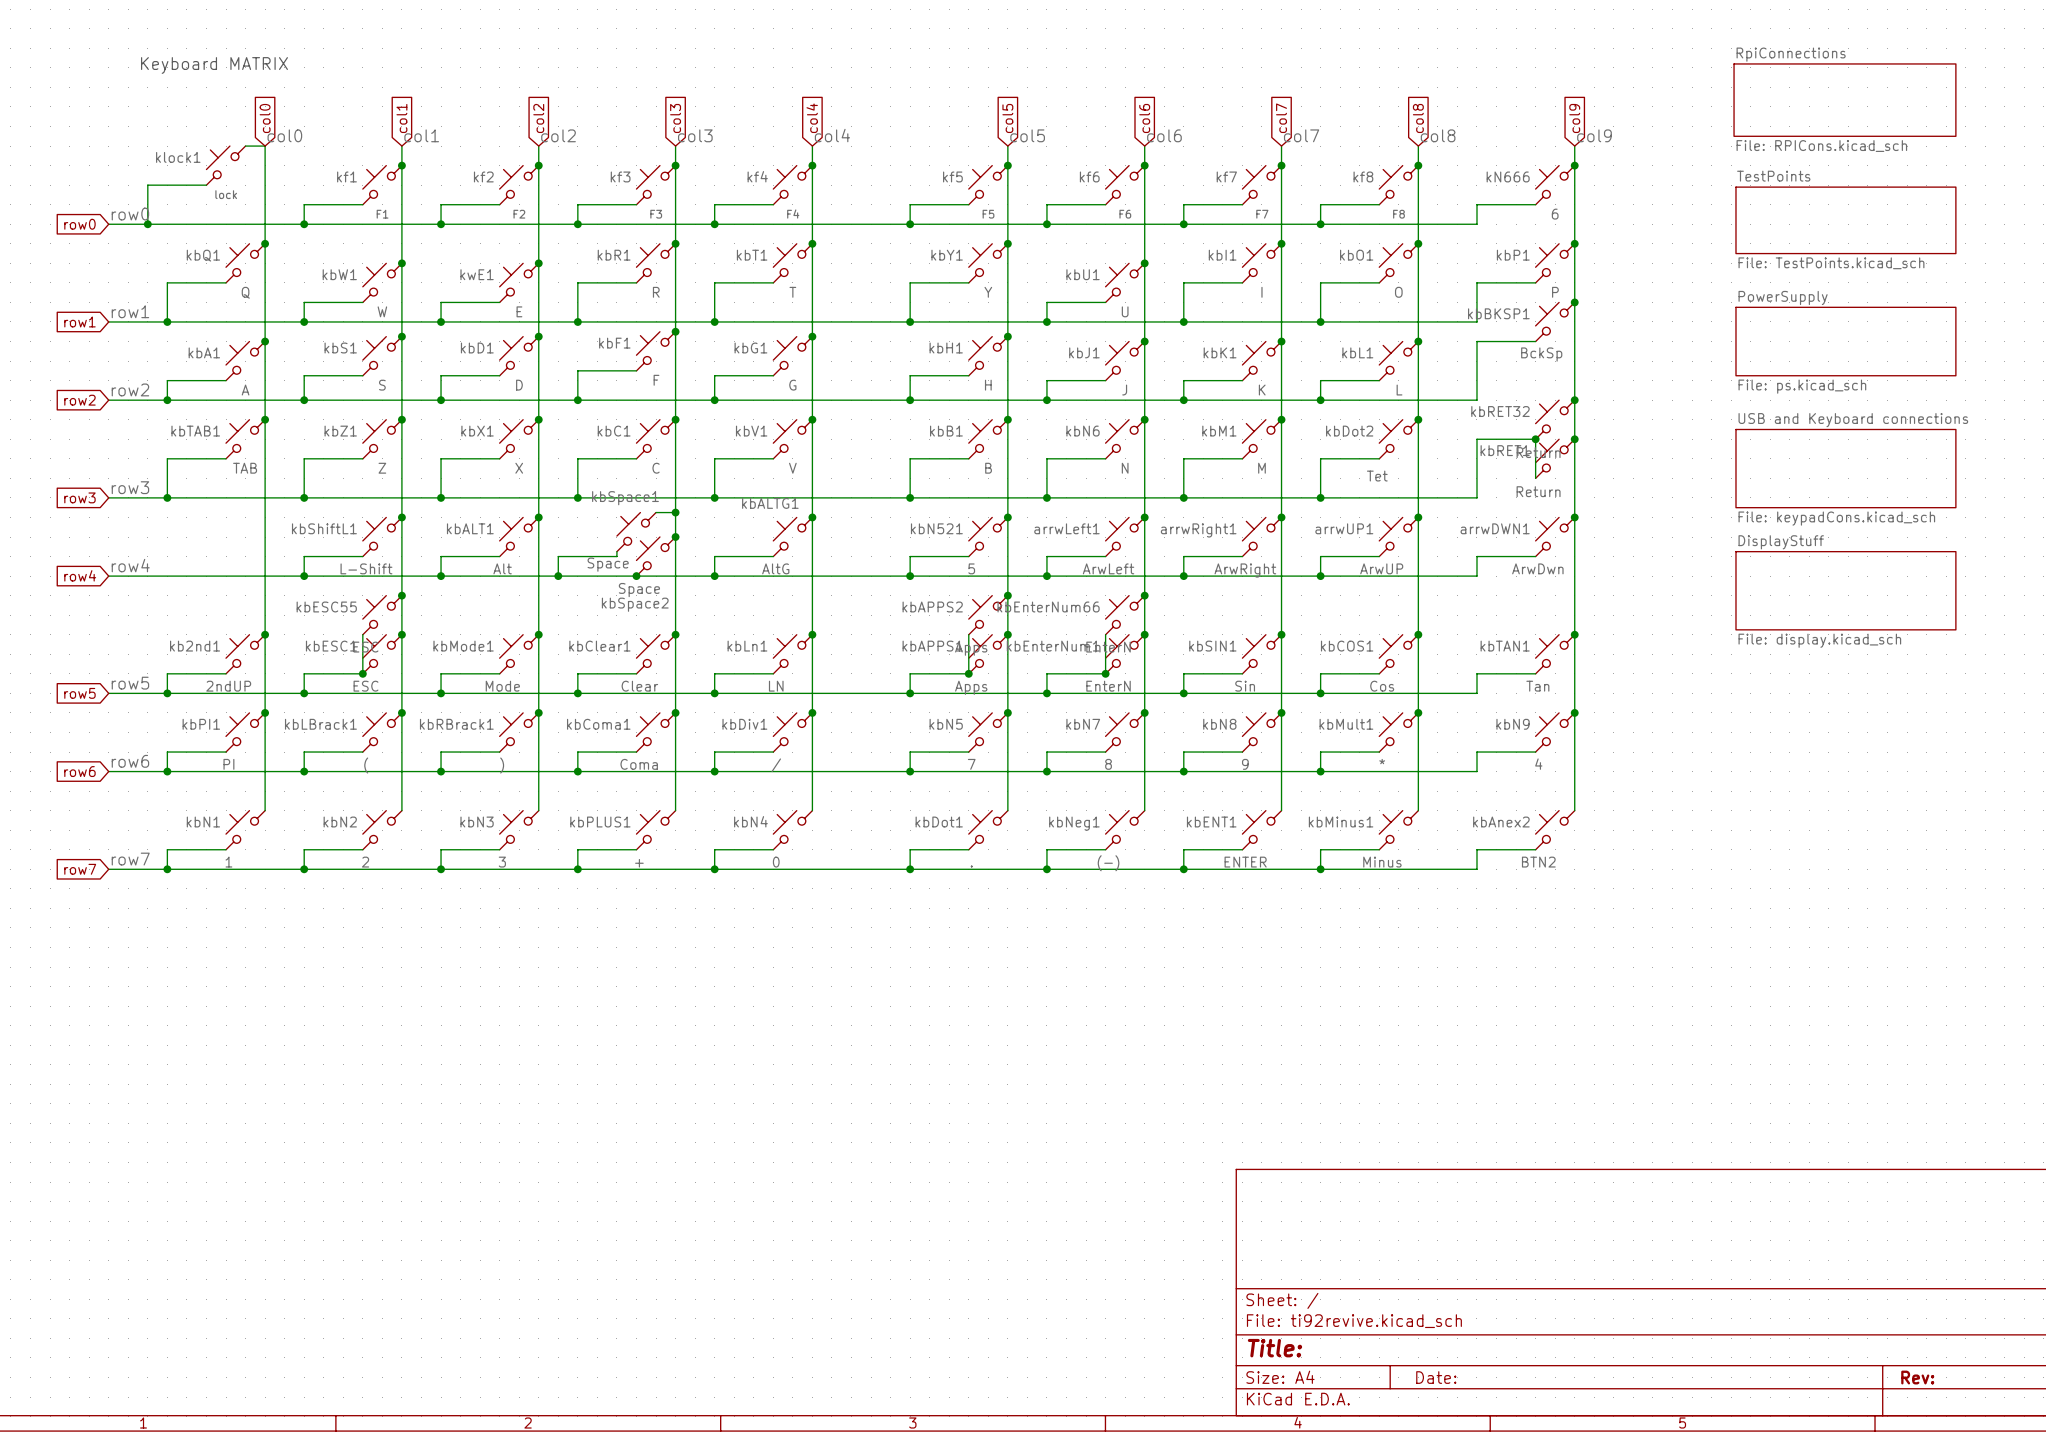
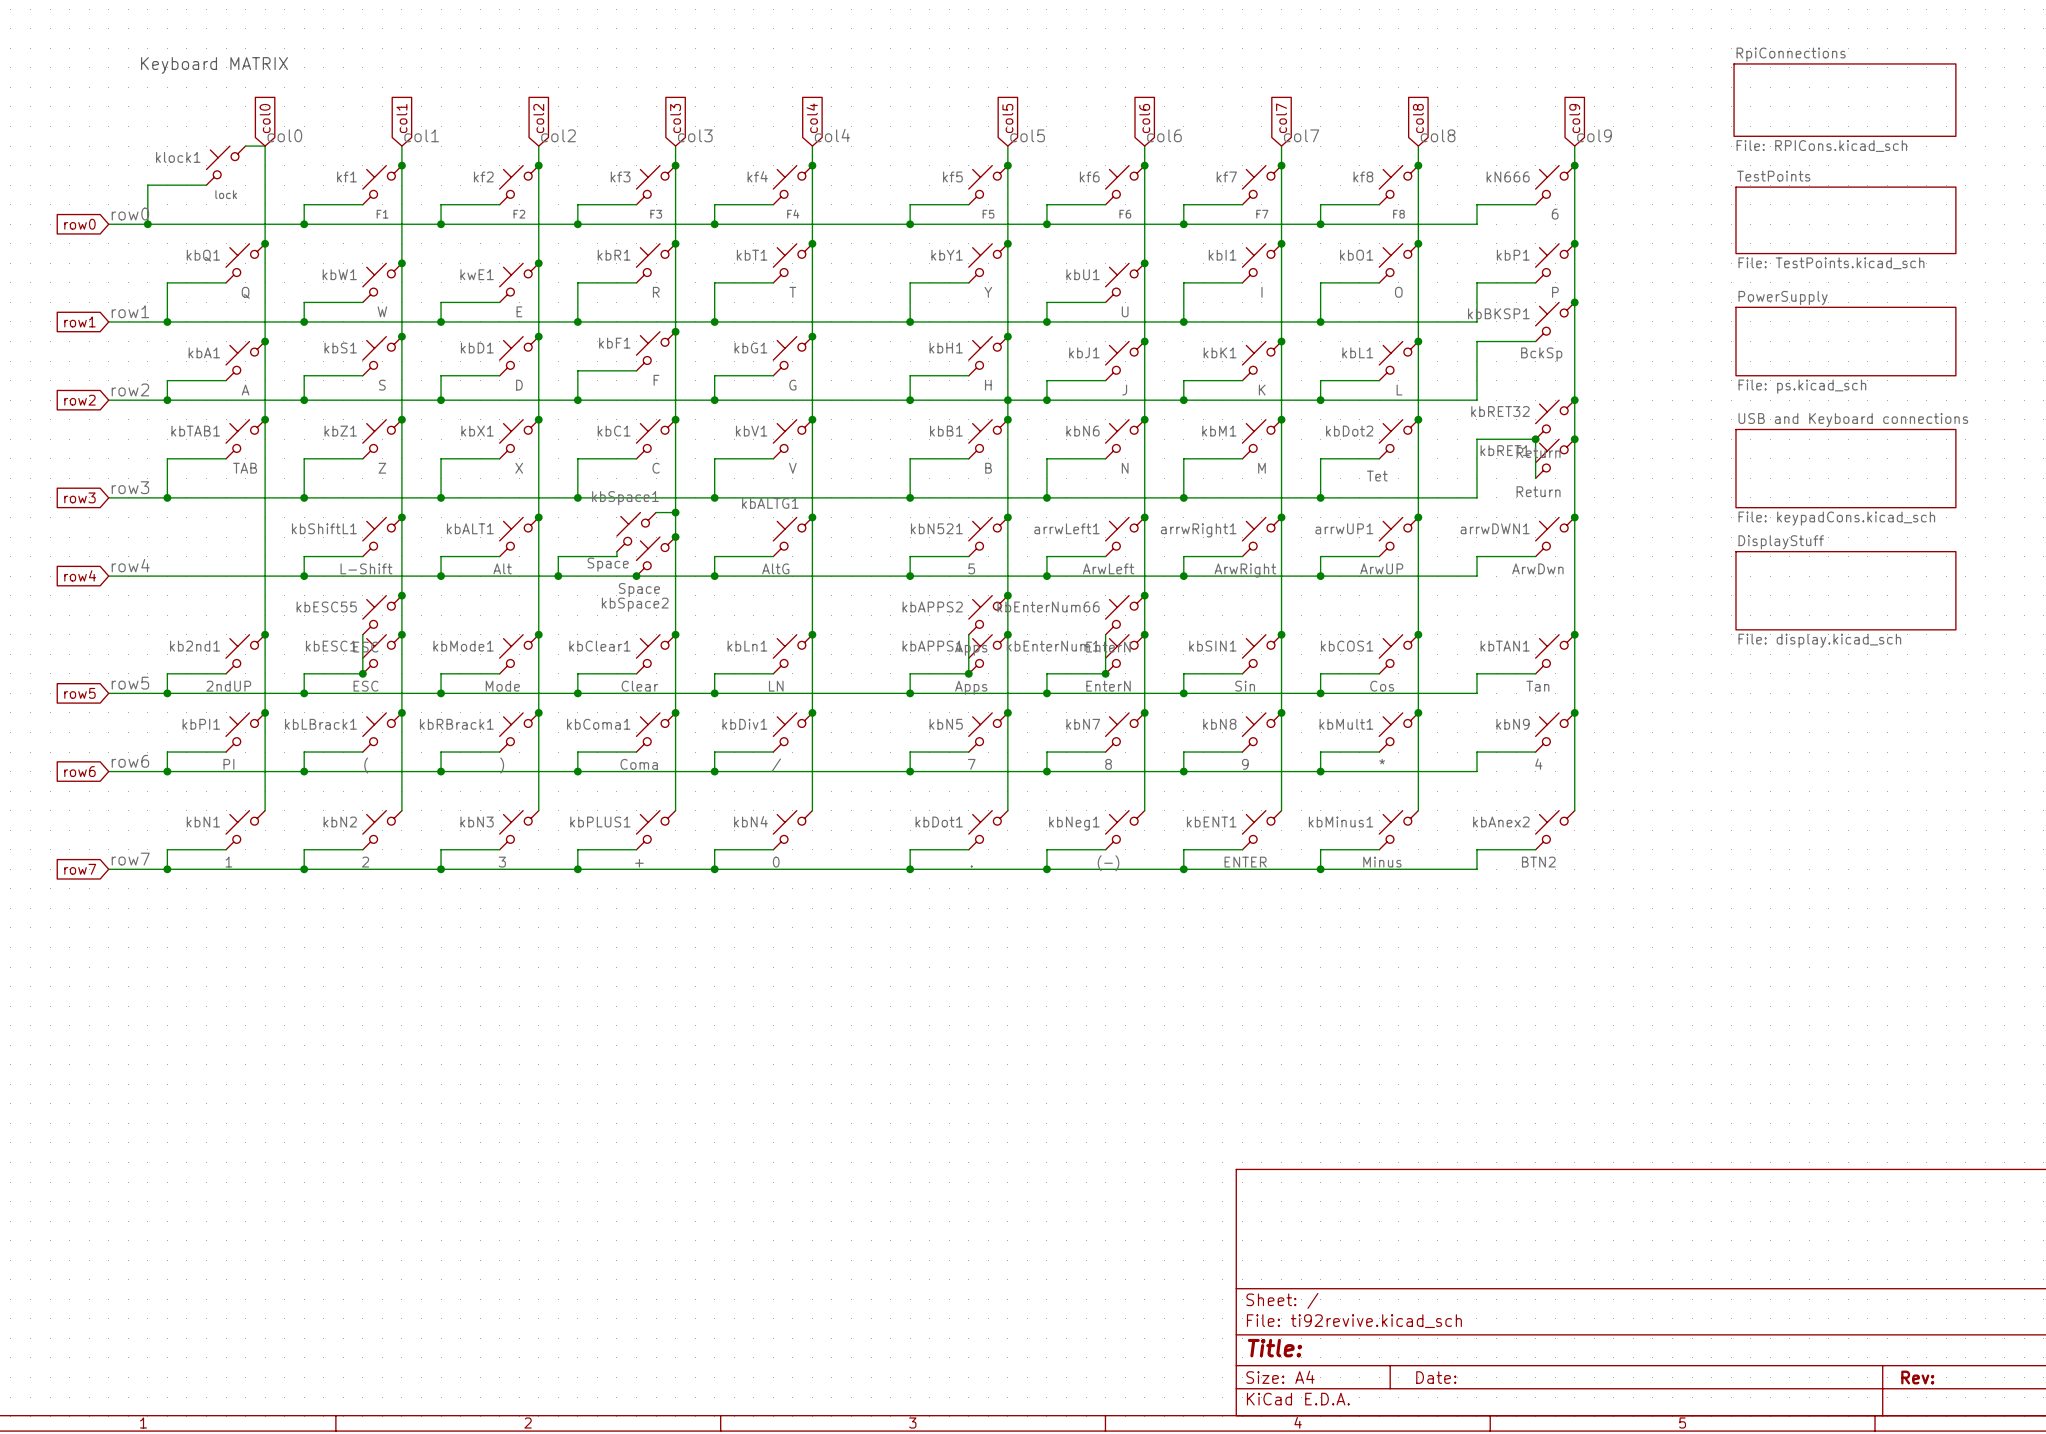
junction: none -> (1007, 400)

